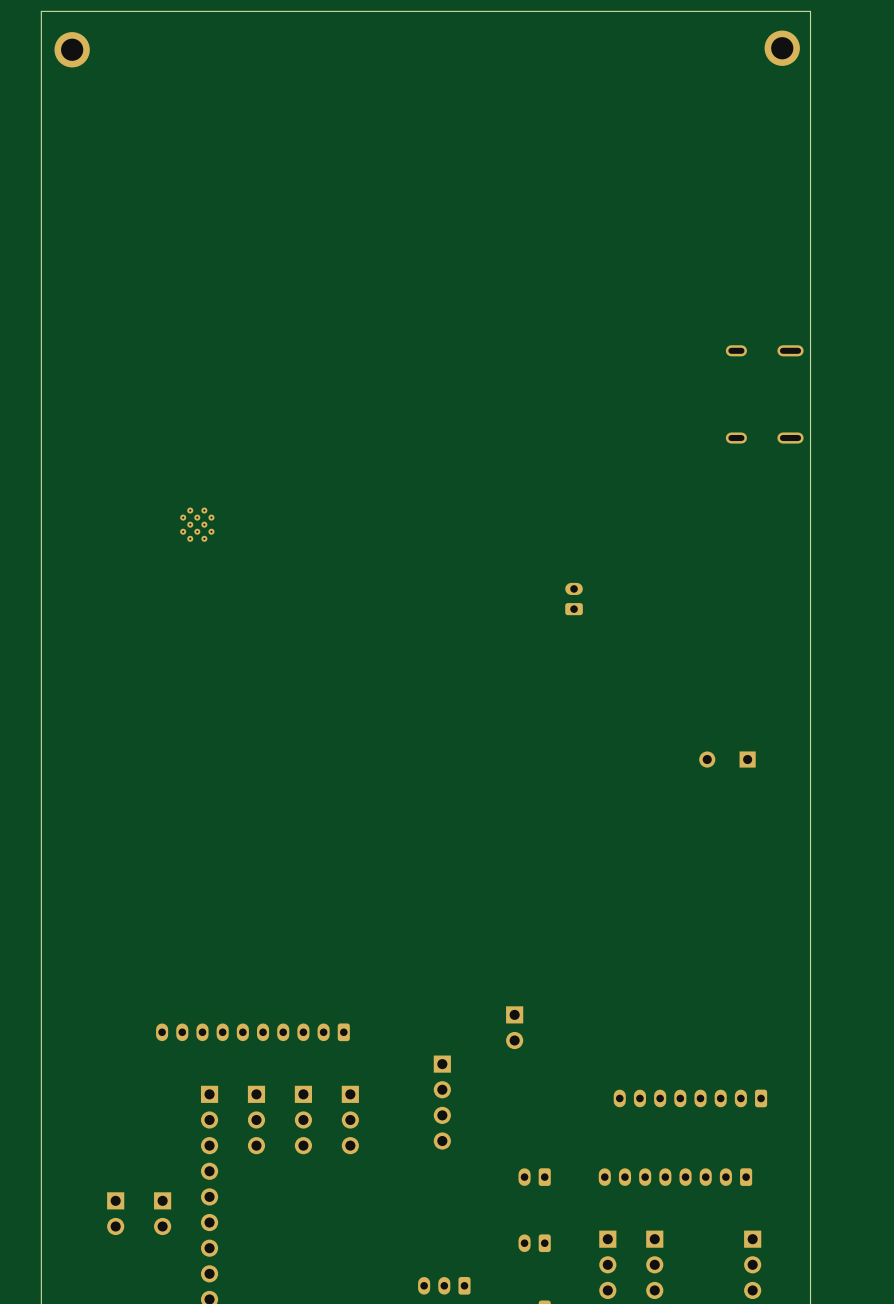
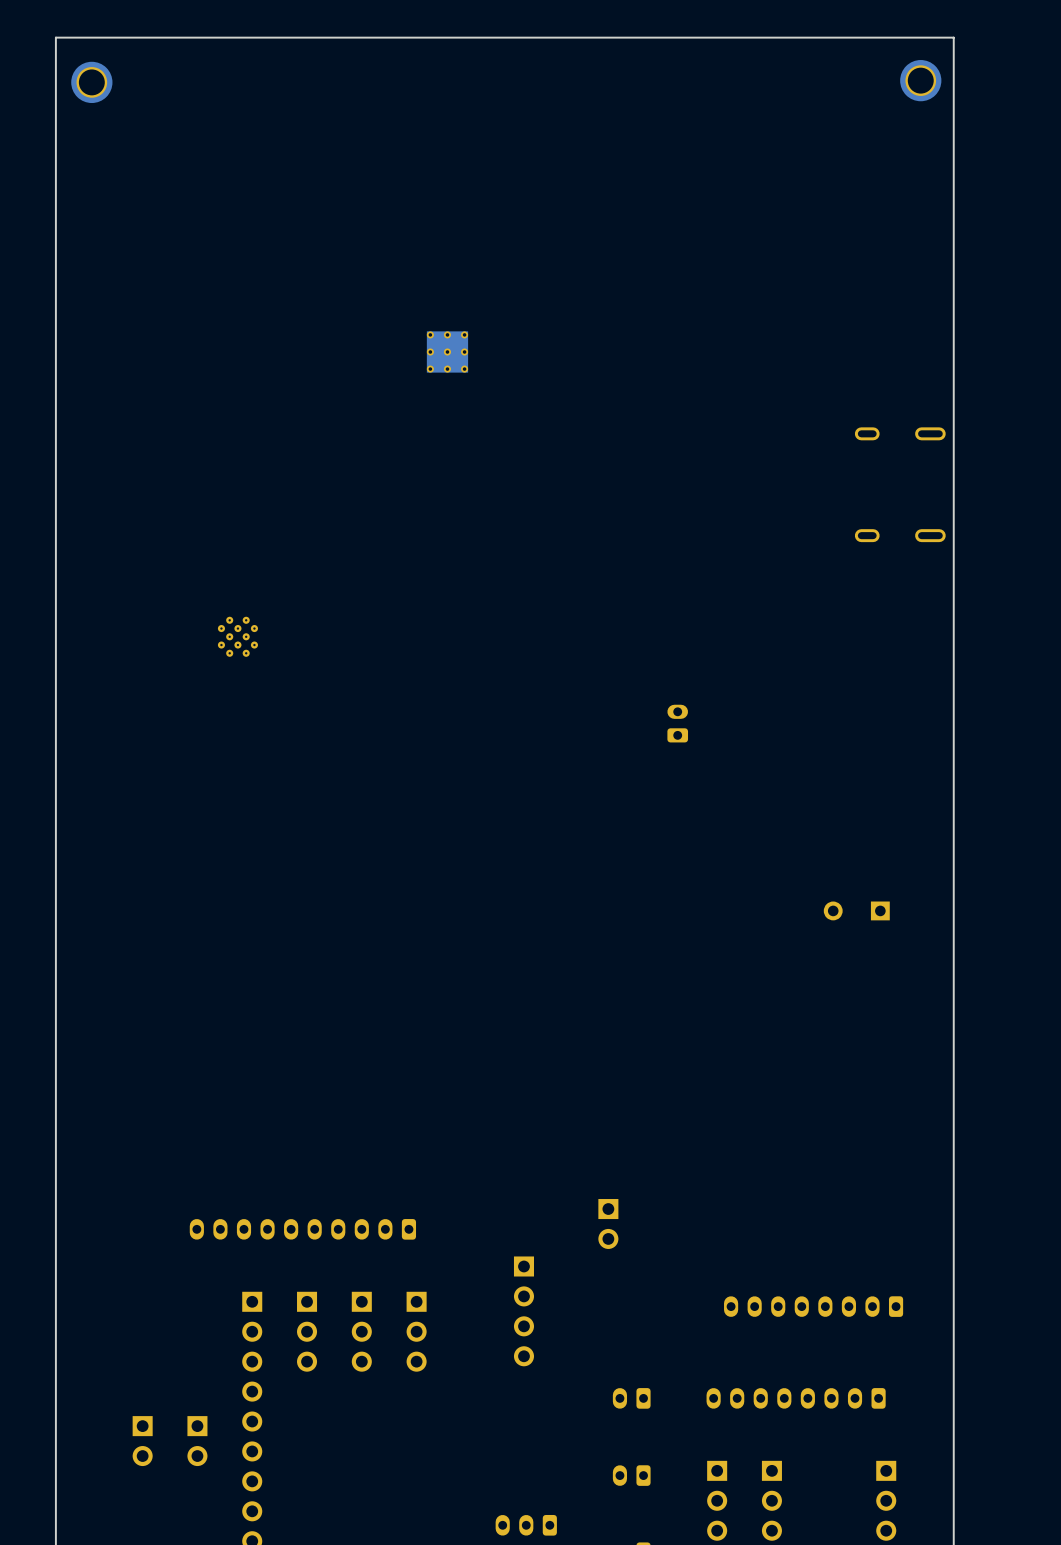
part: none -> (447, 351)

